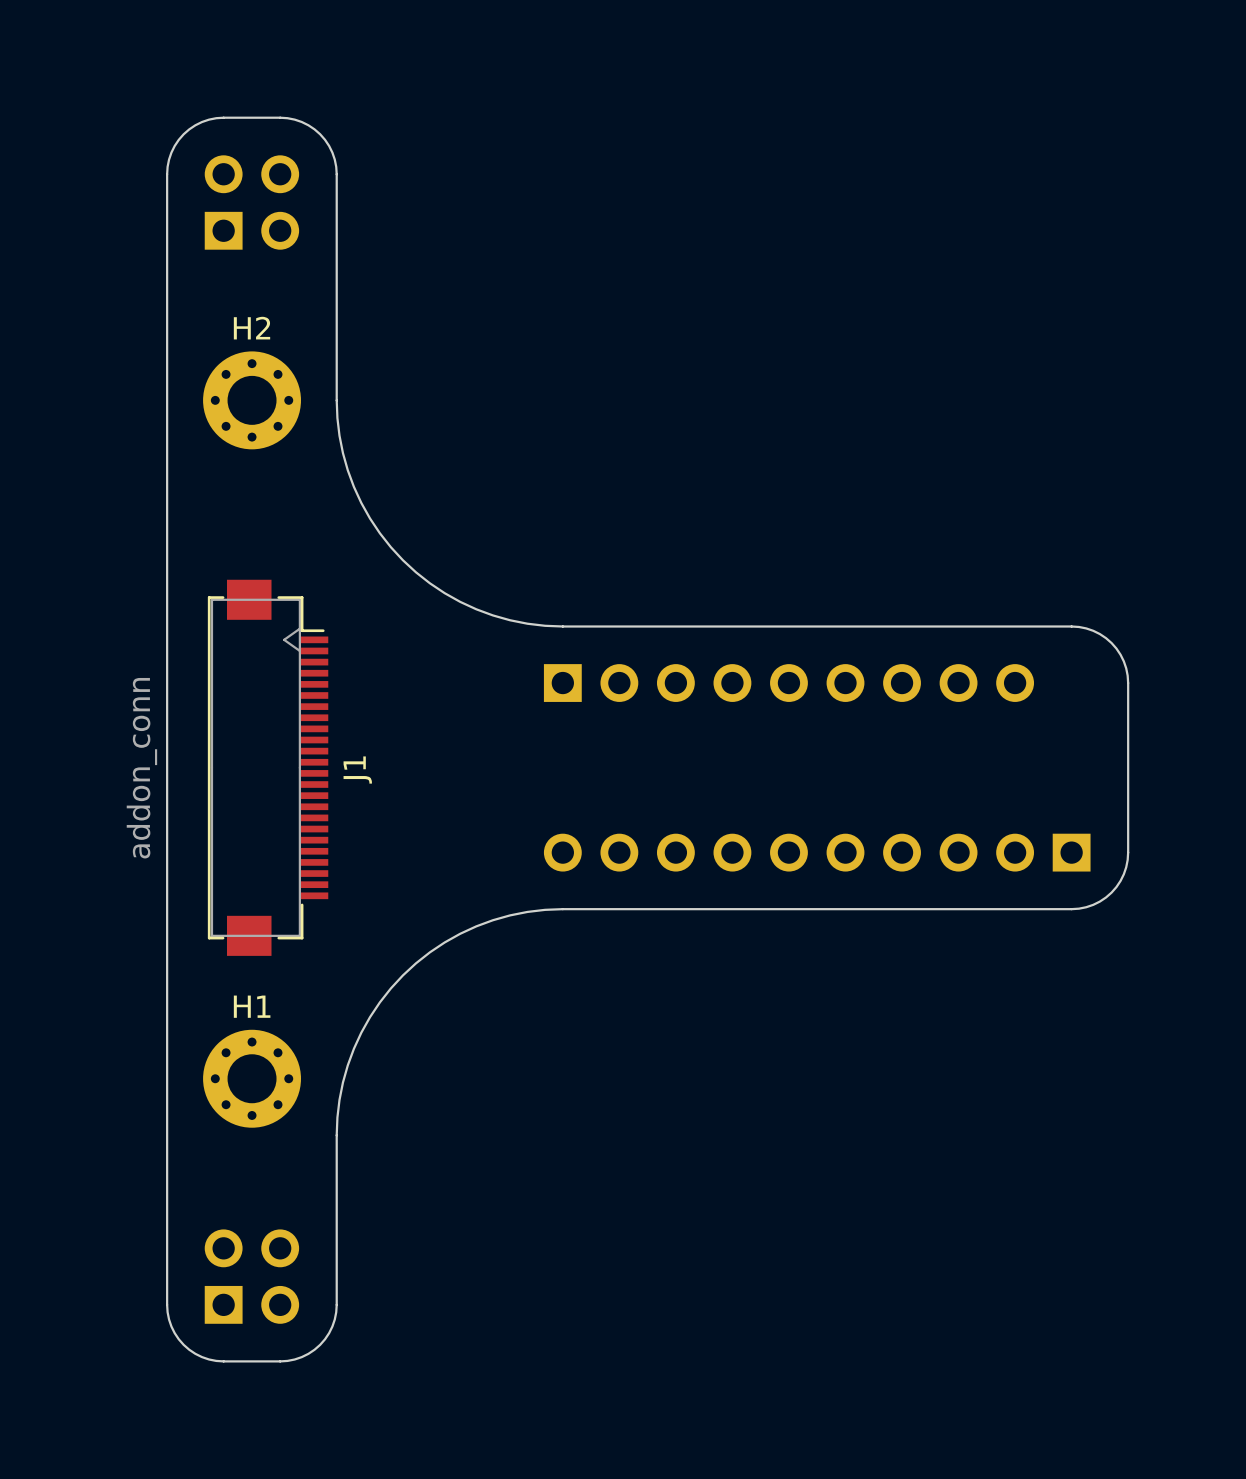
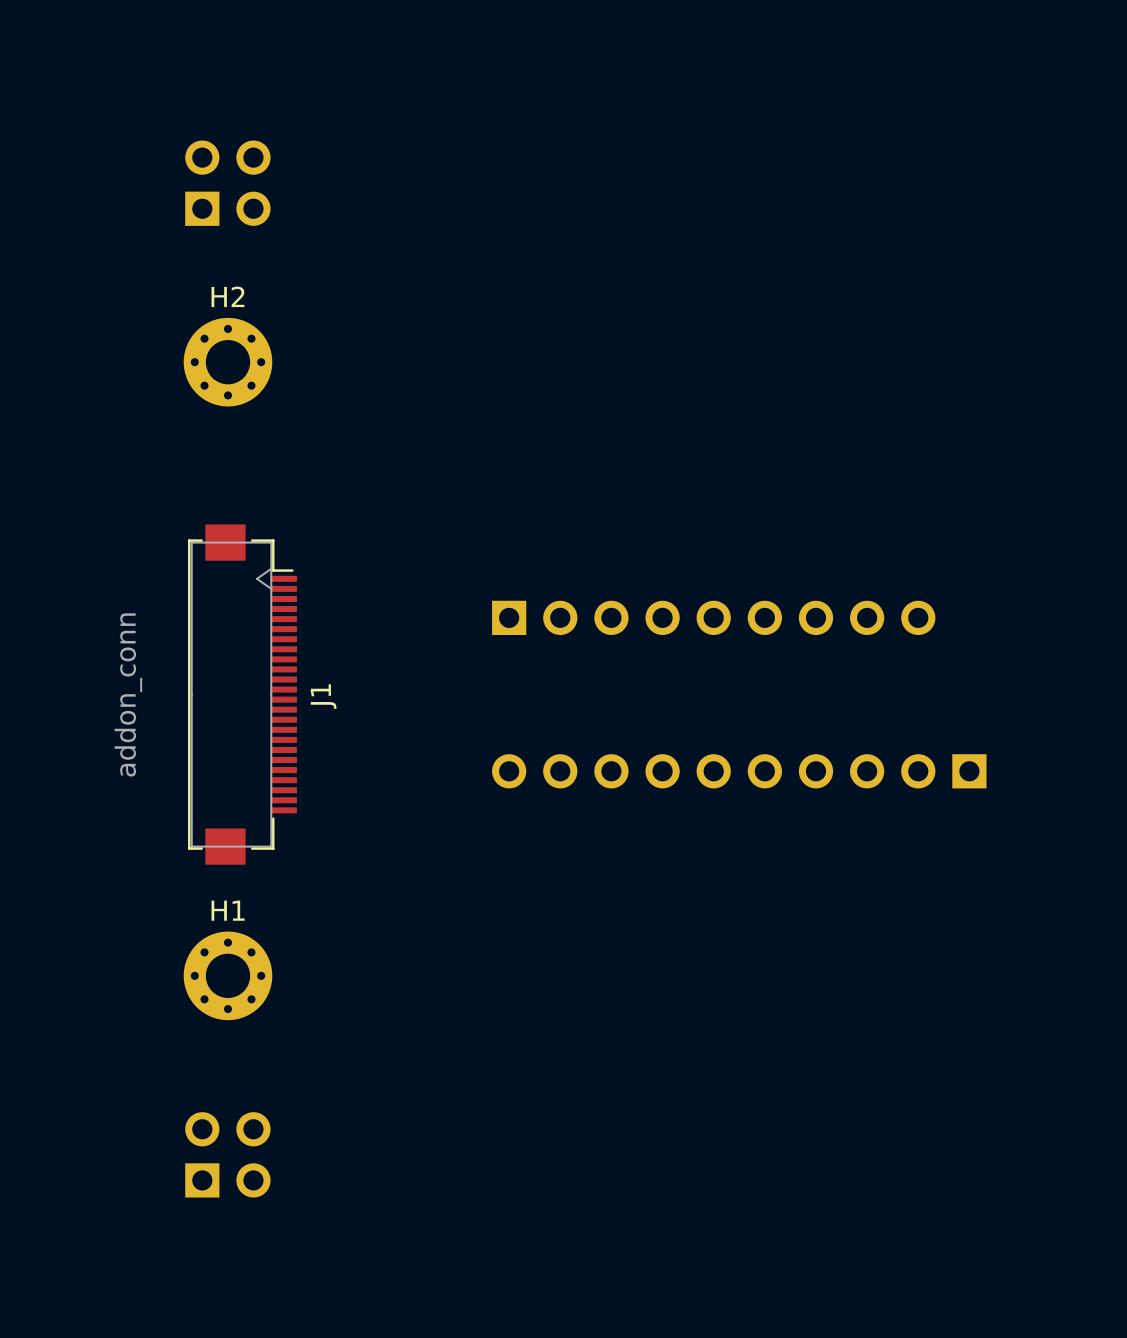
board edge: (223, 117) (280, 117) (294, 119) (314, 129) (325, 139) (332, 152) (336, 174) (336, 400) (342, 453) (361, 503) (379, 533) (415, 572) (444, 593) (492, 615) (545, 625) (1079, 626) (1099, 634) (1111, 643) (1123, 661) (1128, 683) (1127, 860) (1123, 874) (1116, 887) (1106, 897) (1093, 904) (1071, 909) (545, 909) (510, 915) (476, 926) (444, 942) (415, 963) (390, 988) (370, 1017) (353, 1048) (342, 1082) (337, 1117) (336, 1304) (332, 1326) (325, 1339) (308, 1353) (294, 1359) (280, 1361) (216, 1360) (195, 1353) (183, 1344) (174, 1333) (169, 1319) (167, 1304) (167, 174) (171, 152) (183, 134) (202, 122) (223, 117) -> none

